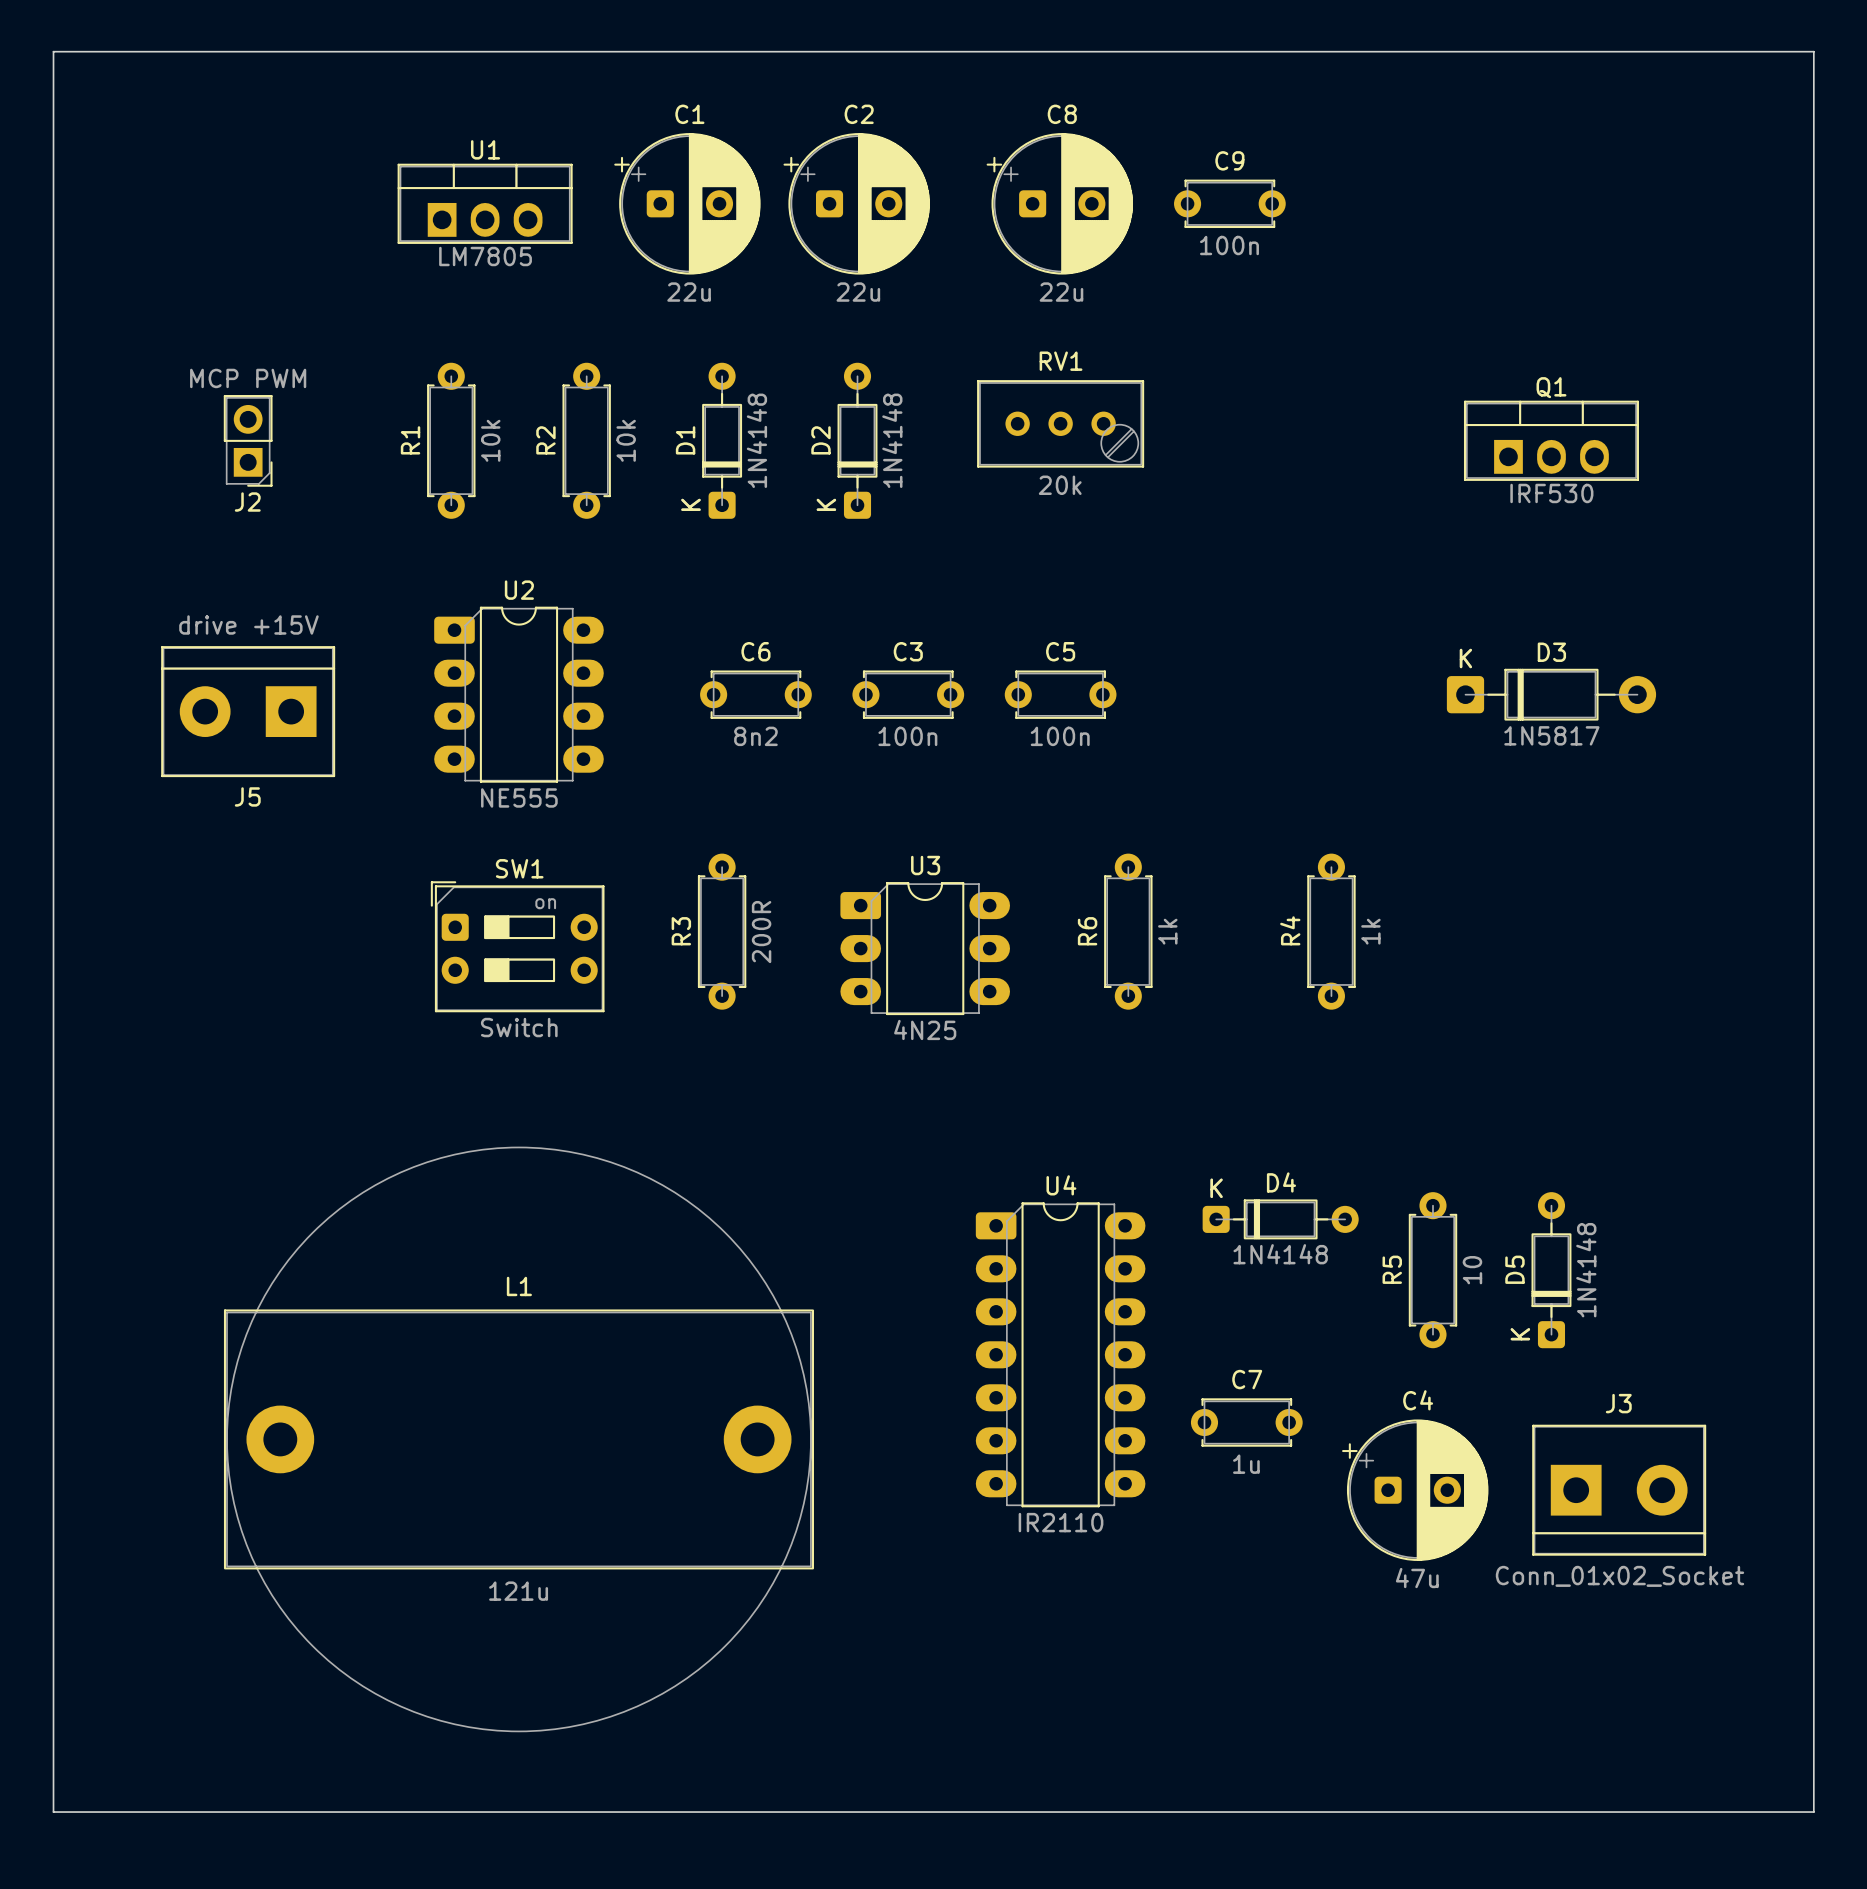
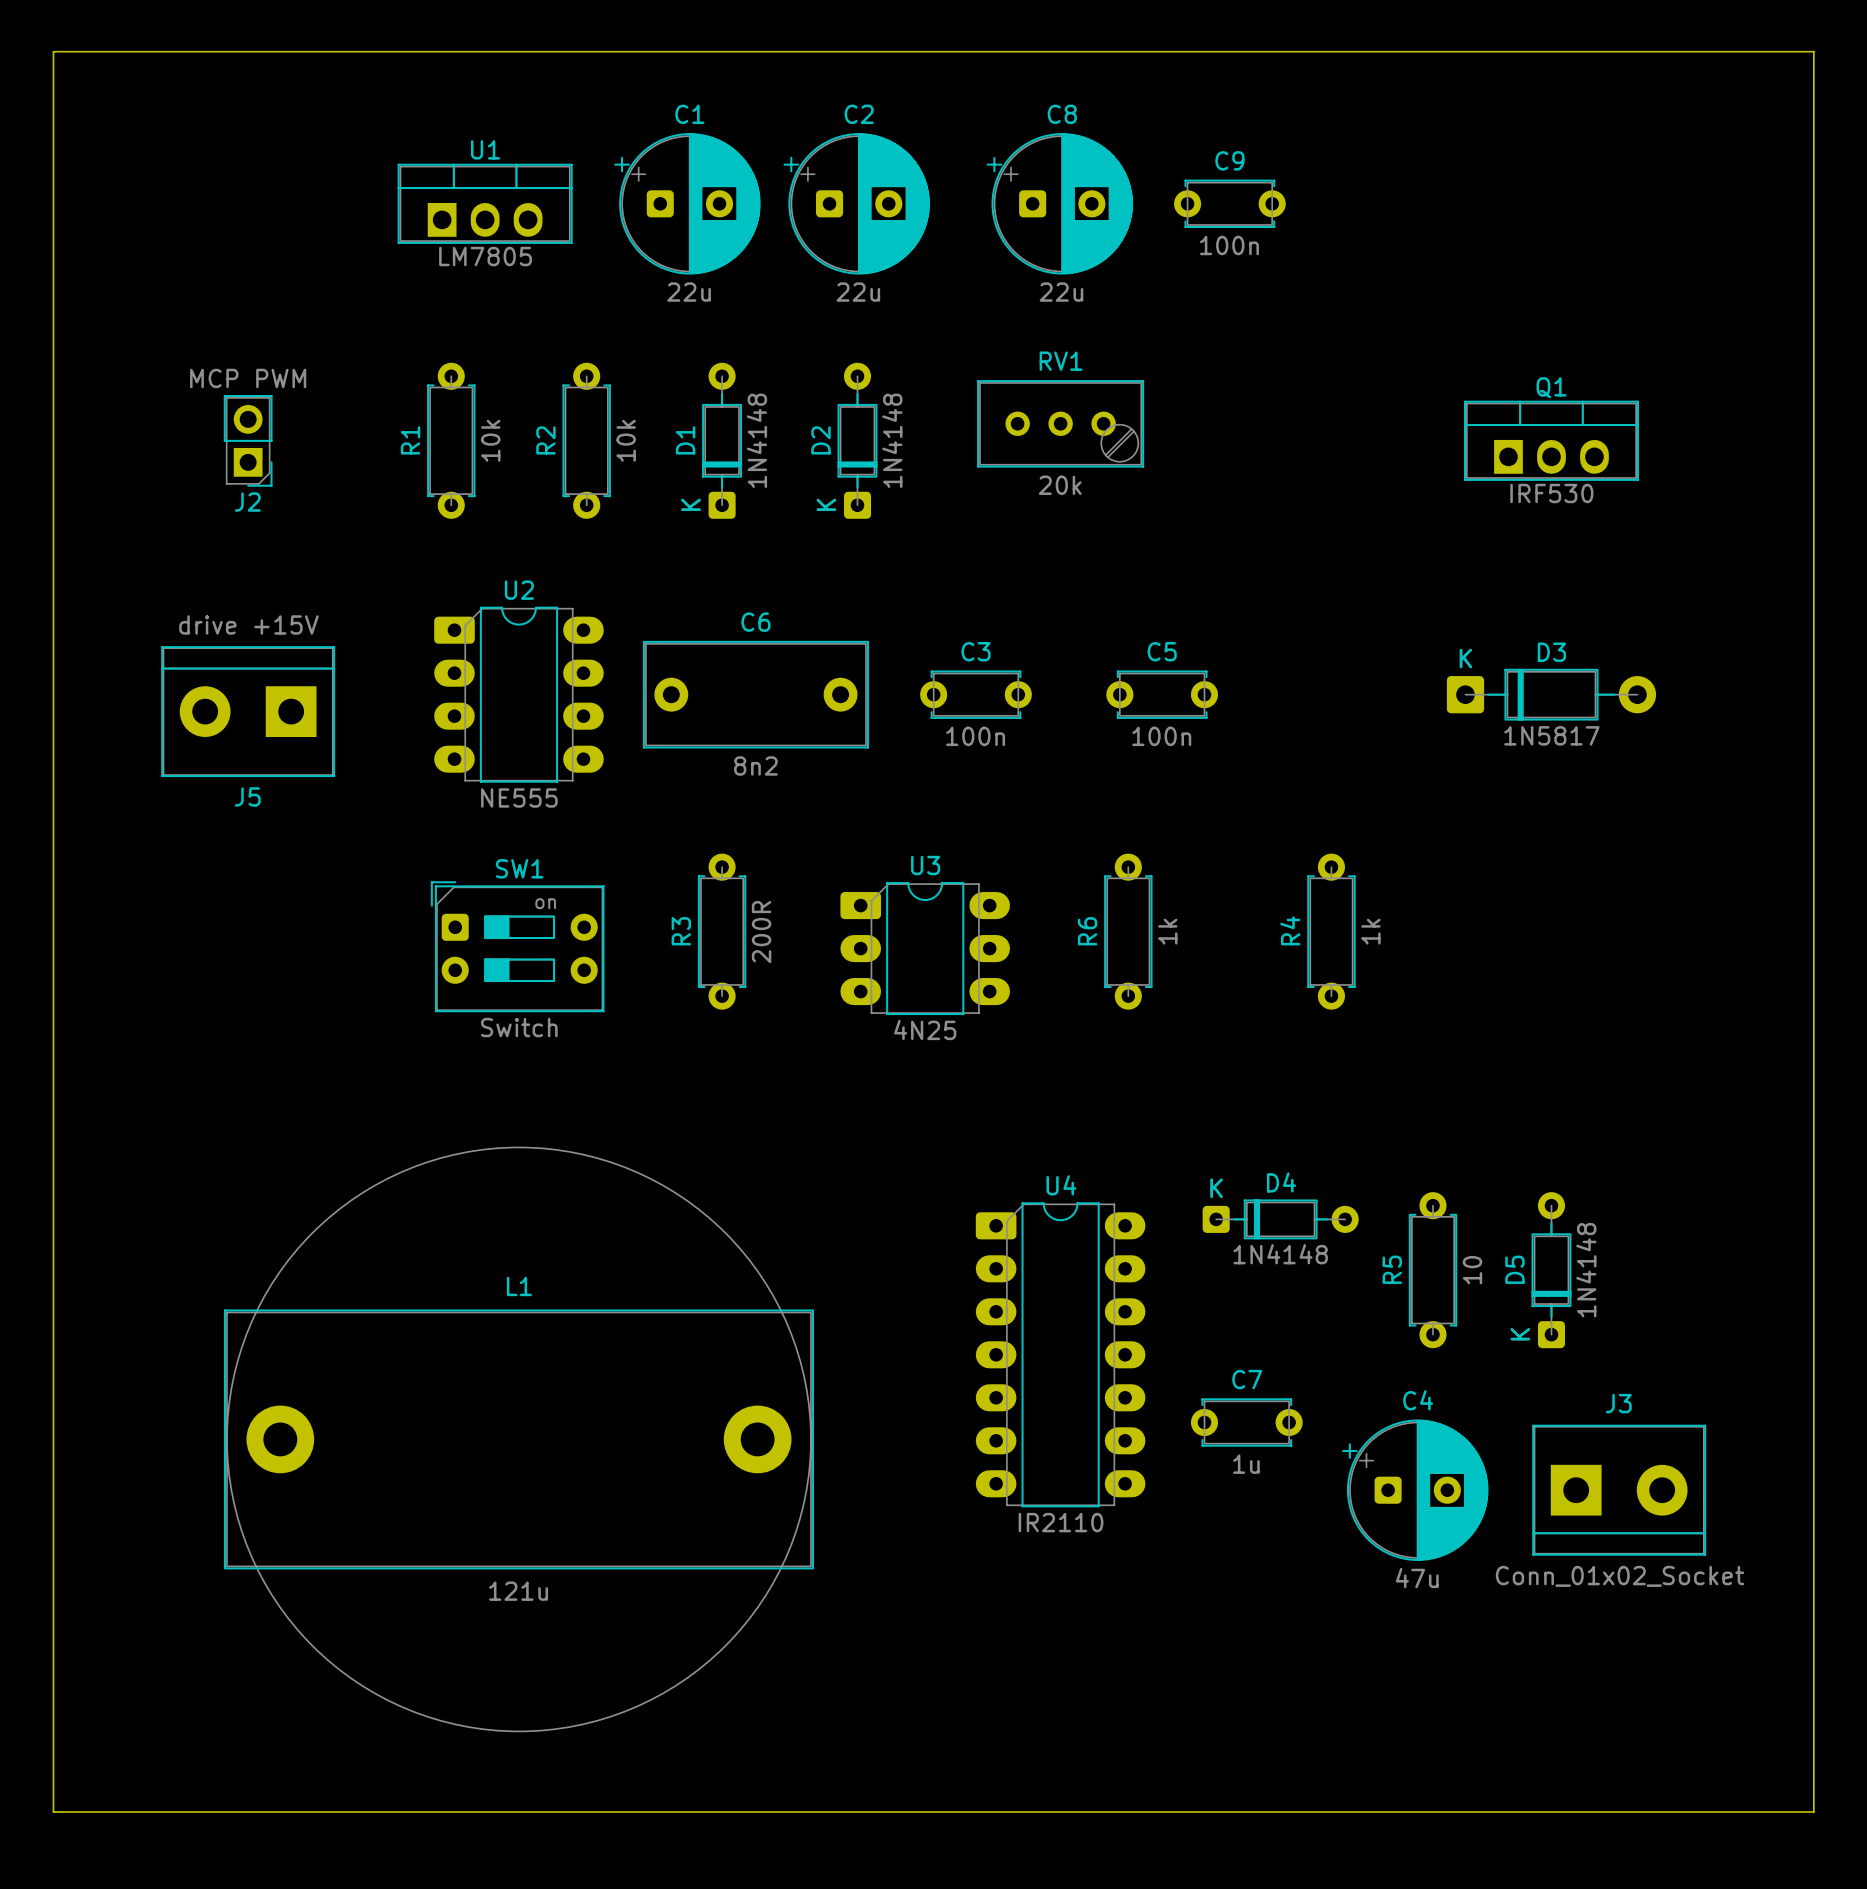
C6 footprint: [700, 670, 812, 719] -> [642, 640, 870, 749]
C3 position: (908, 694) -> (975, 694)
C5 position: (1060, 694) -> (1162, 694)

